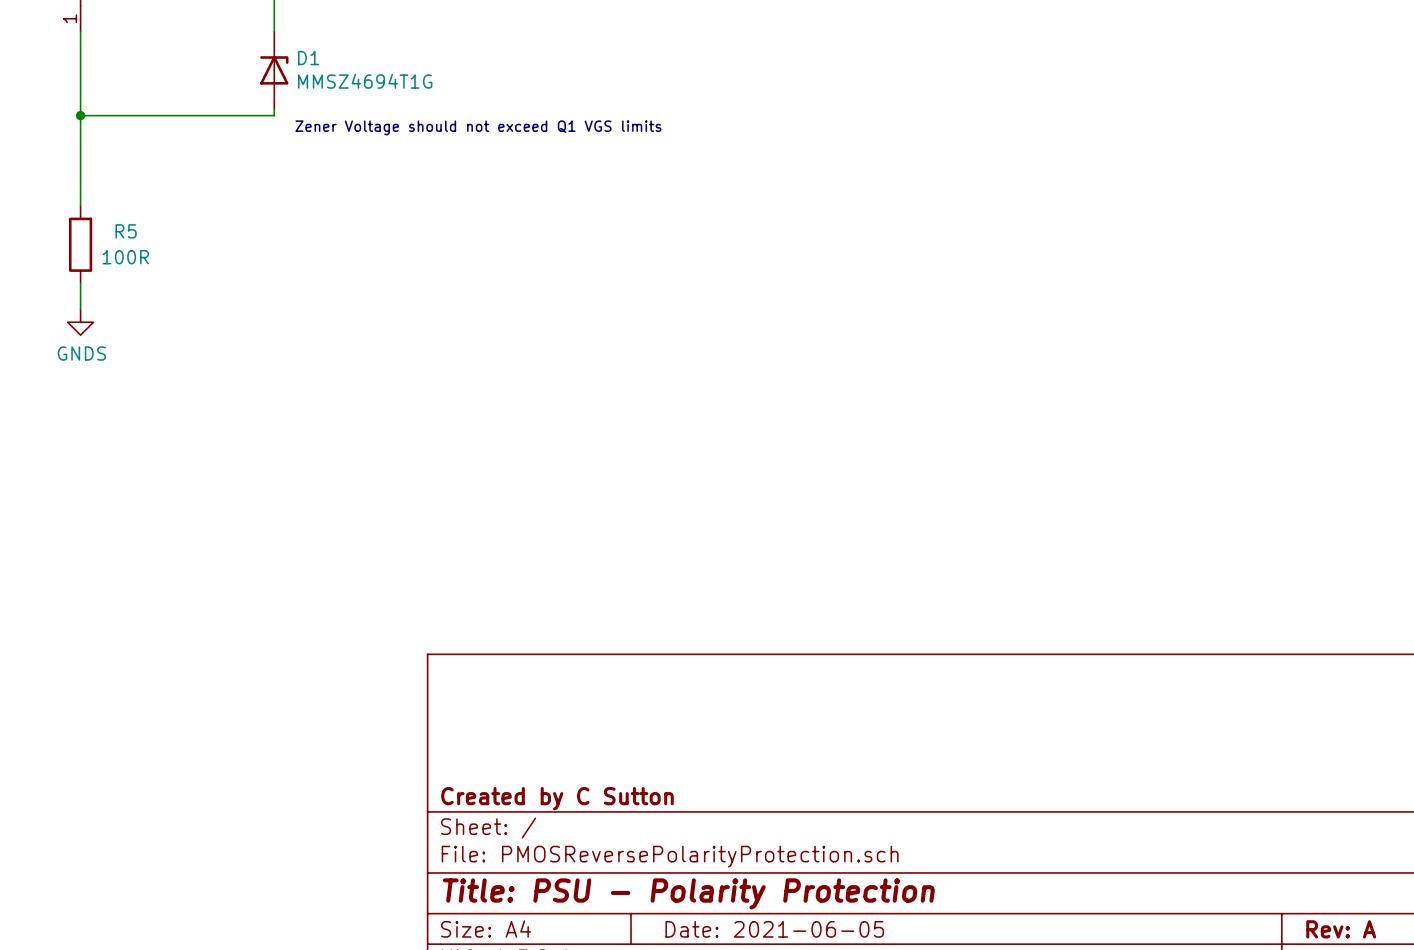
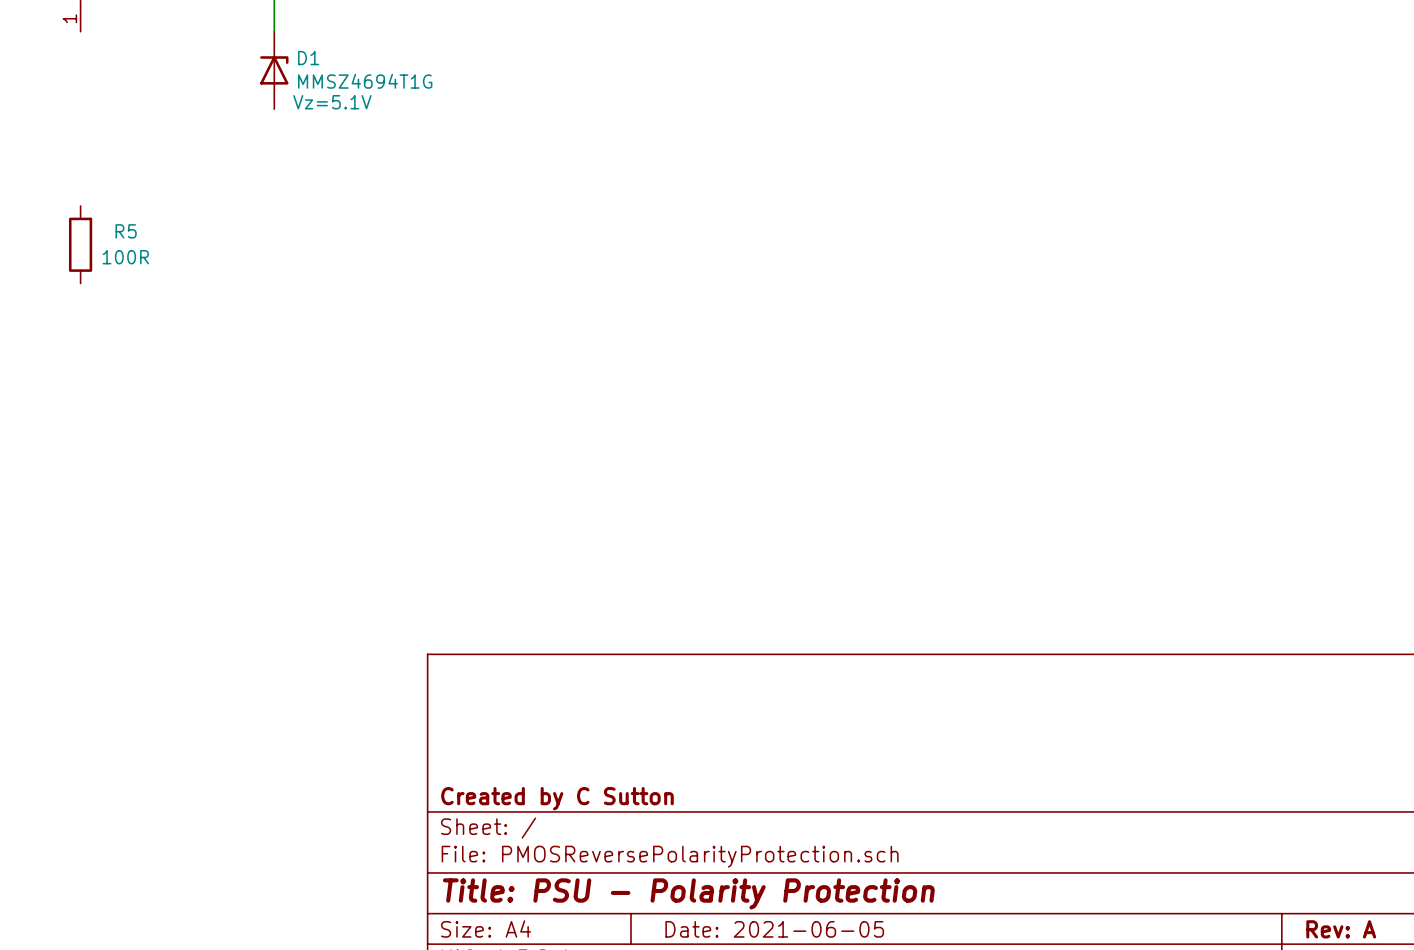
wire: (80, 31) (80, 206) -> none
D1 text: none -> Vz=5.1V (332, 102)
wire: (274, 109) (274, 115) (80, 115) -> none
junction: (80, 115) -> none
text: Zener Voltage should not exceed Q1 VGS limits (478, 127) -> none
wire: (80, 283) (80, 309) -> none
power symbol: GNDS (80, 322) -> none

